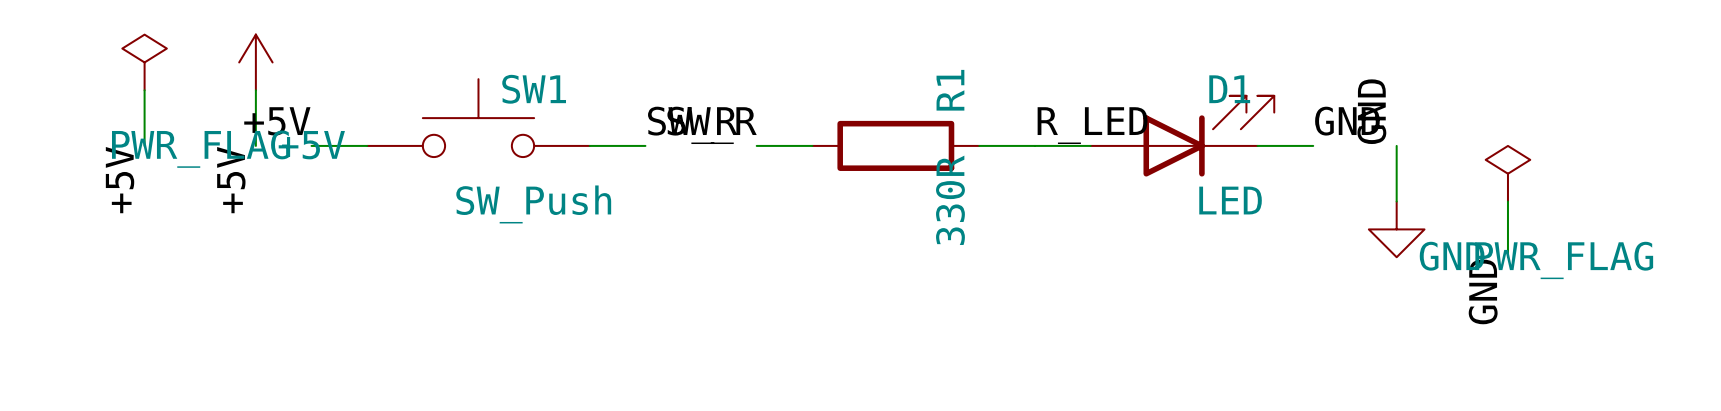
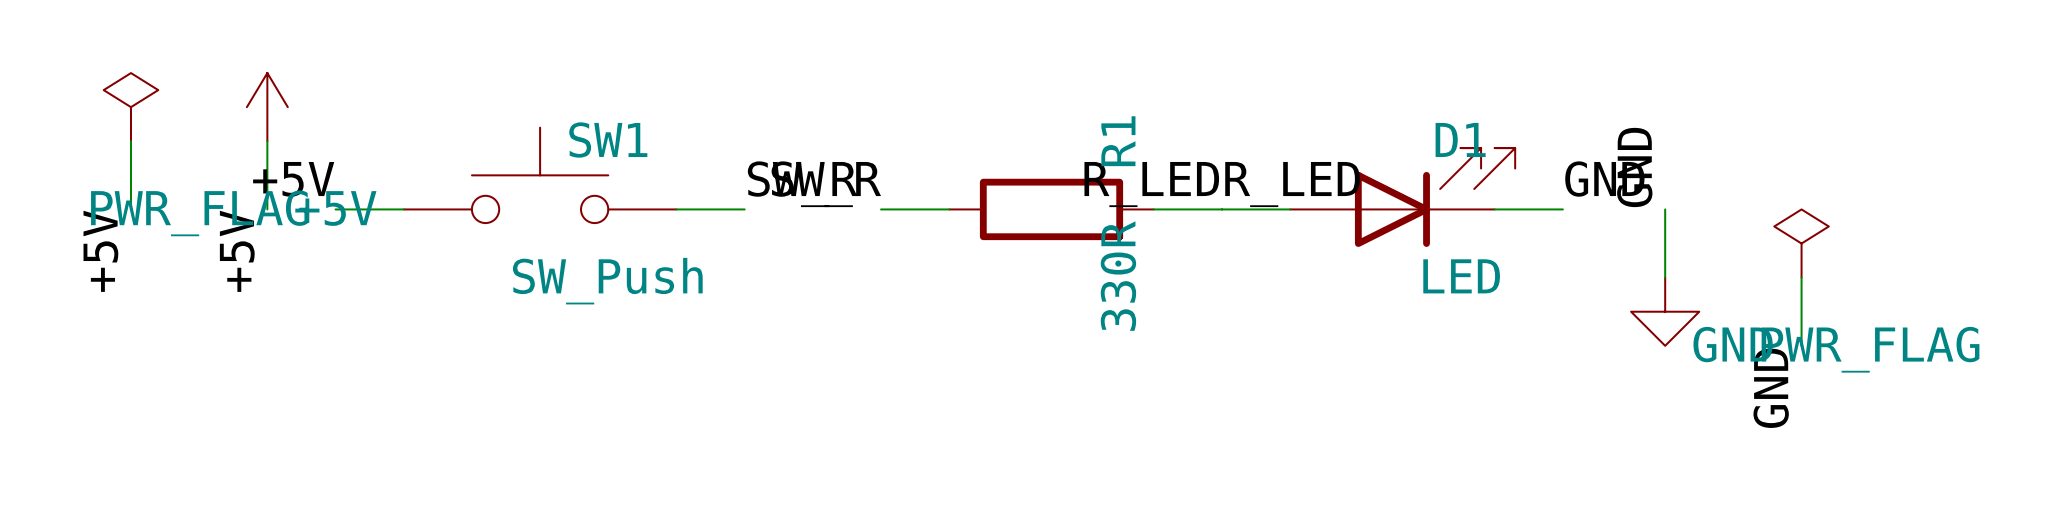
label: none -> R_LED (1151, 184)

